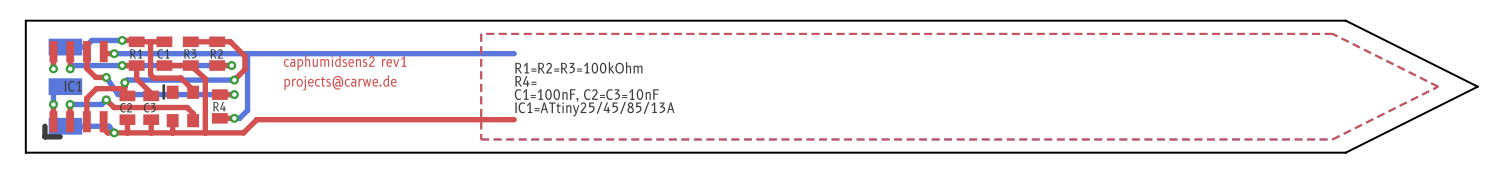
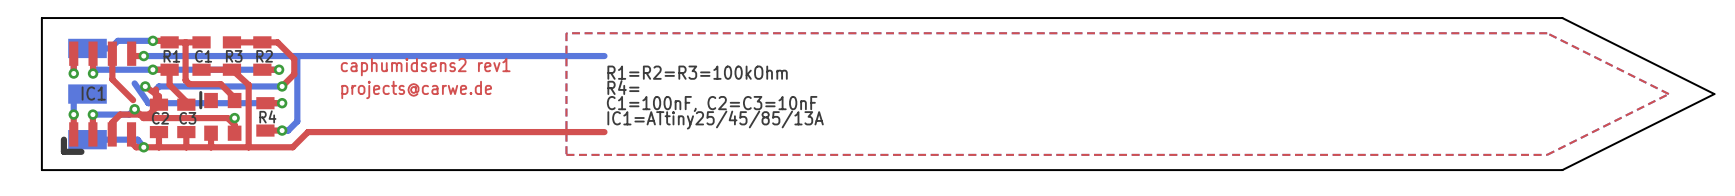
top track: (86, 68) (95, 77) (106, 77) -> (112, 73) (112, 79) (133, 100)
via: (106, 77) -> none
via: none -> (145, 86)
via: (124, 82) -> none
top track: (124, 86) (121, 88) (96, 88) (86, 98) (86, 111) -> (145, 86) (158, 96) (158, 104) (149, 114) (120, 114) (112, 122)
via: none -> (234, 118)

